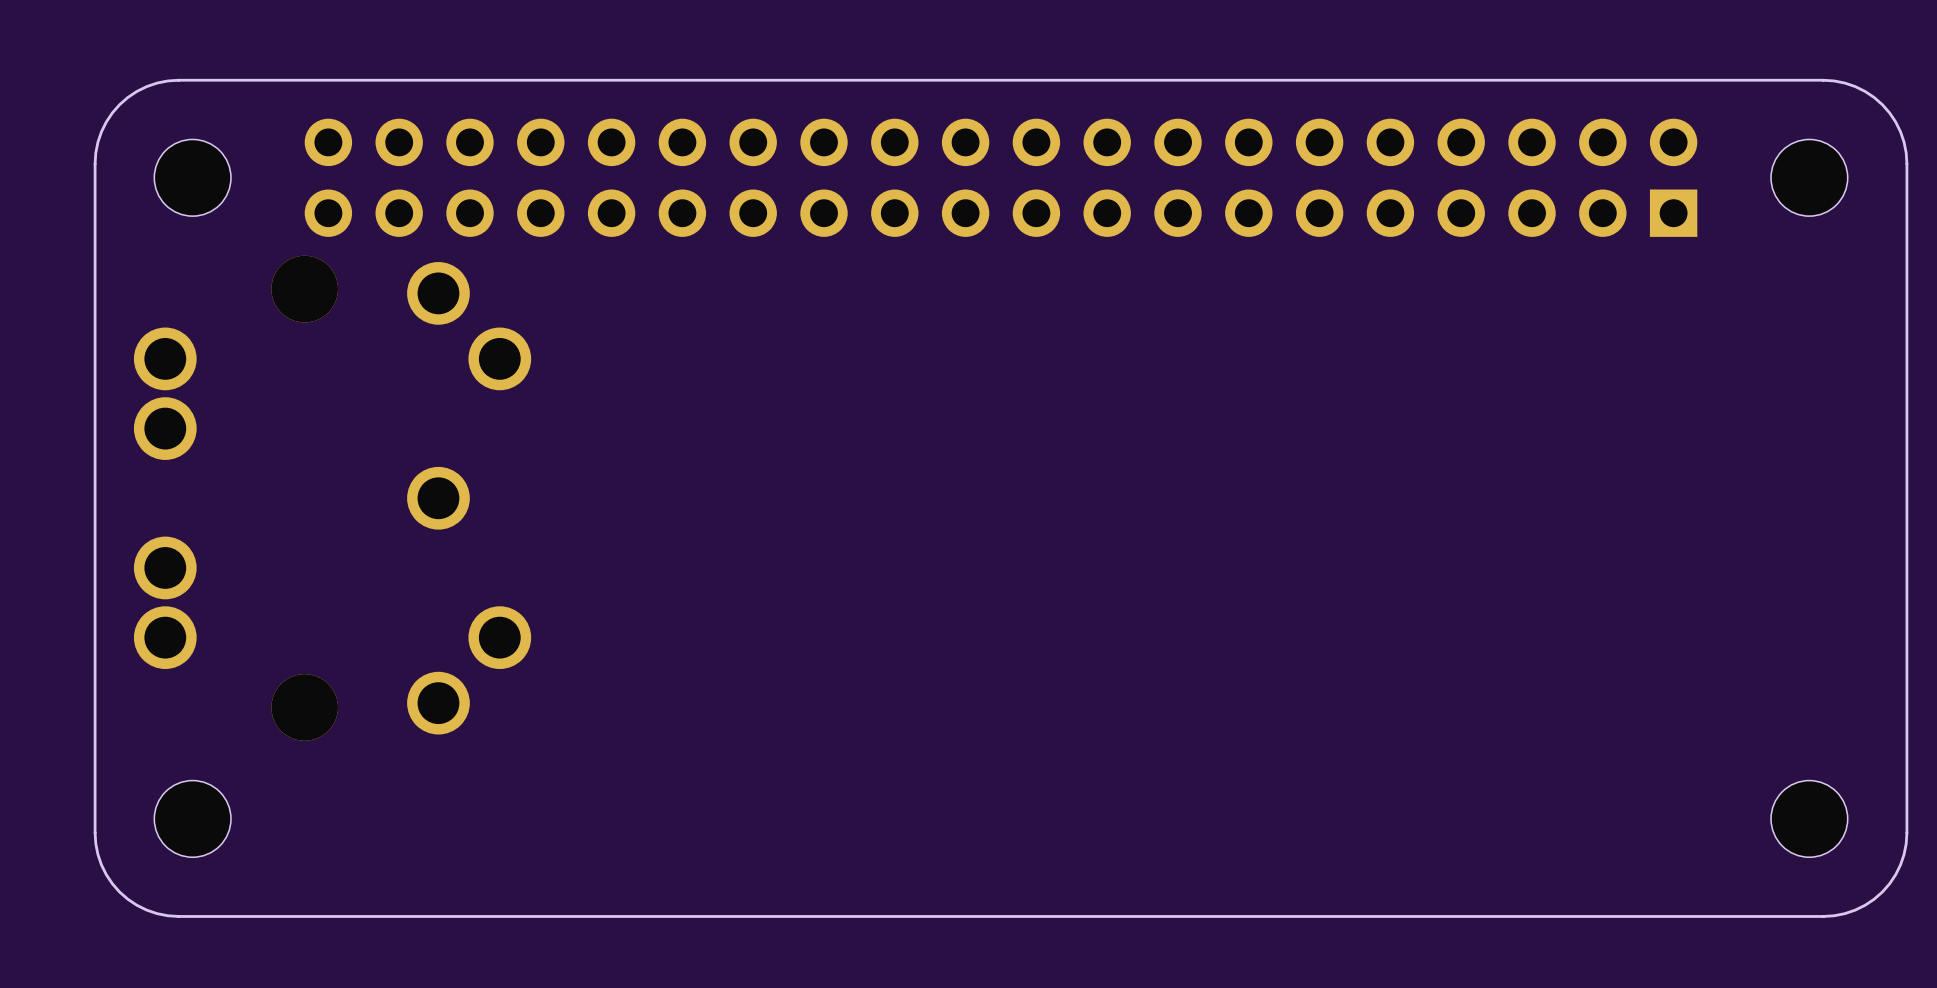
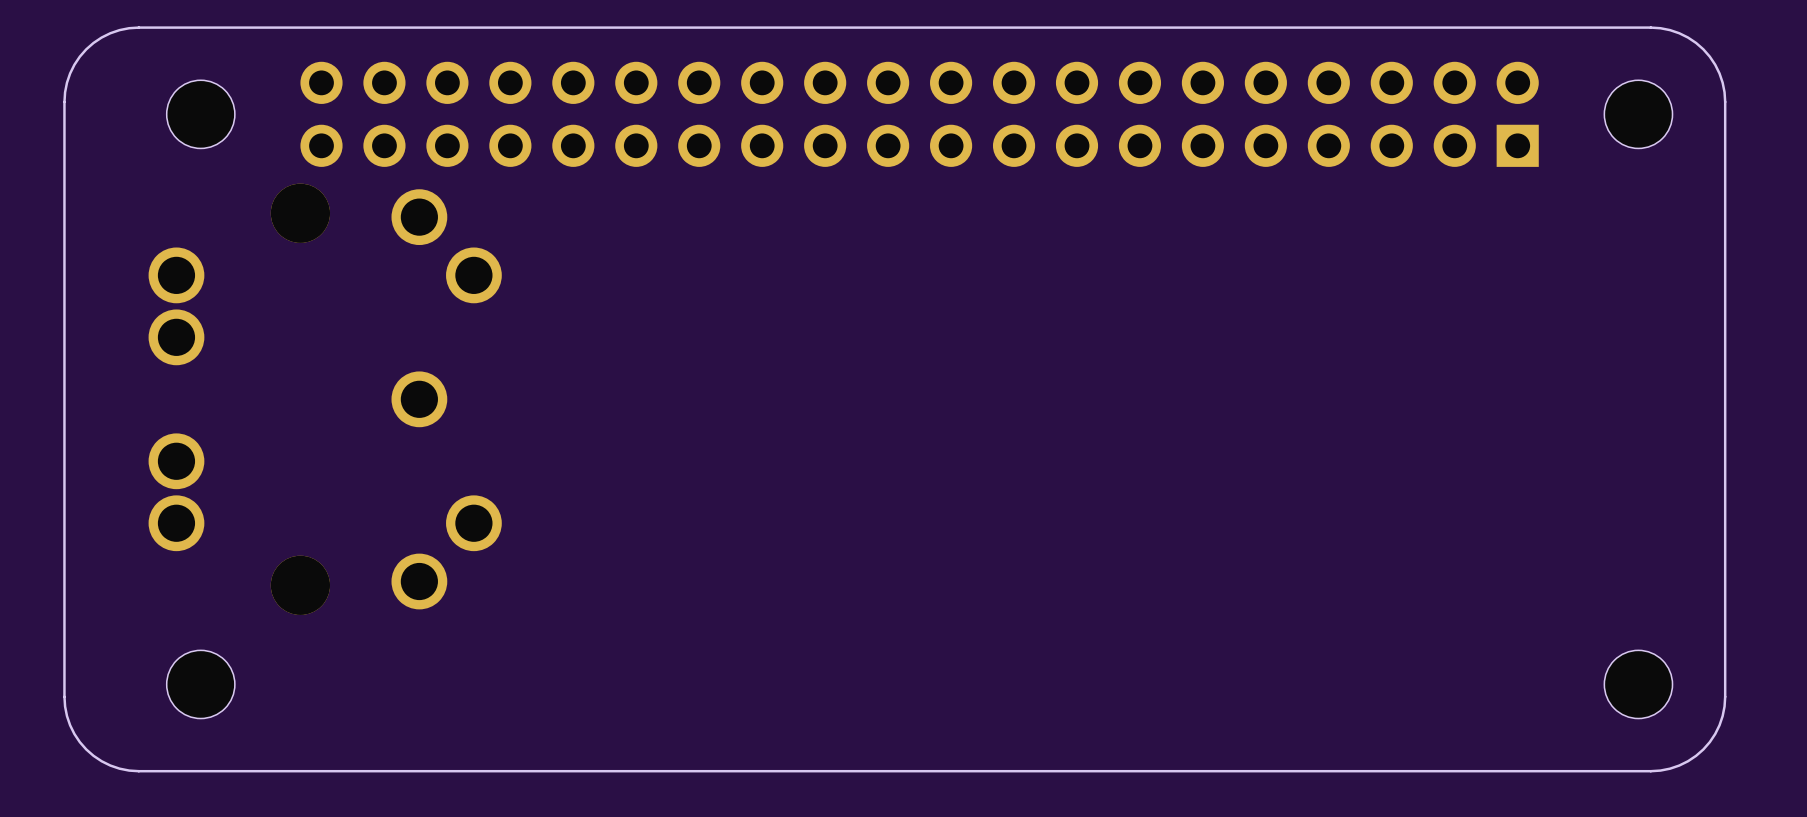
board edge: (178, 80) (146, 86) (119, 104) (101, 131) (95, 163) (95, 843) (101, 864) (119, 891) (146, 910) (178, 916) -> (188, 27) (129, 28) (101, 37) (86, 49) (74, 64) (66, 82) (64, 101) (65, 706) (74, 734) (86, 749) (101, 761) (129, 770) (188, 771)

